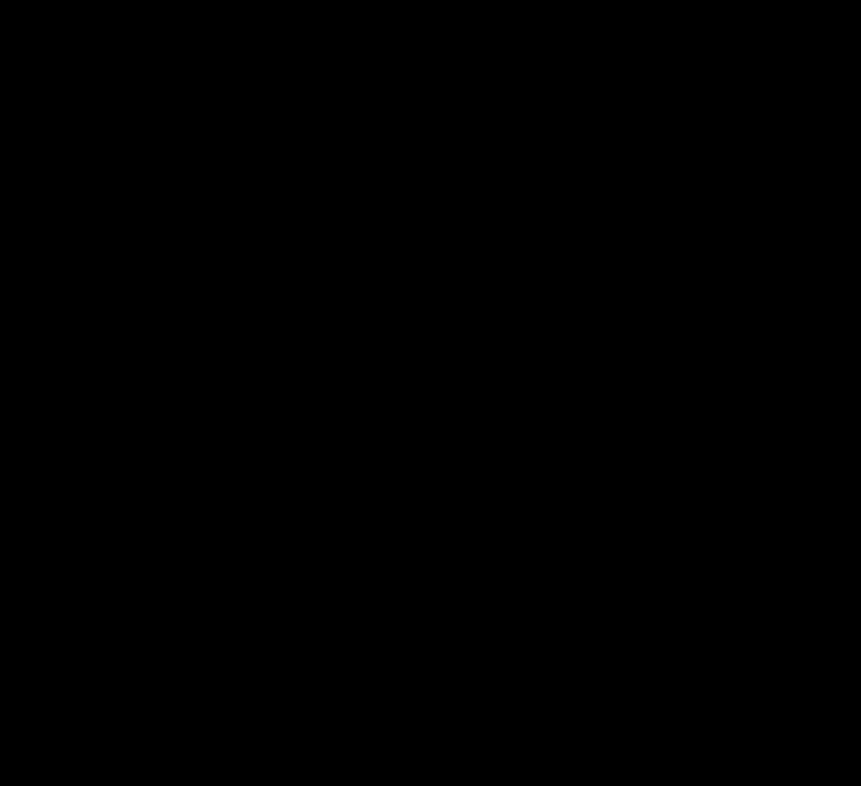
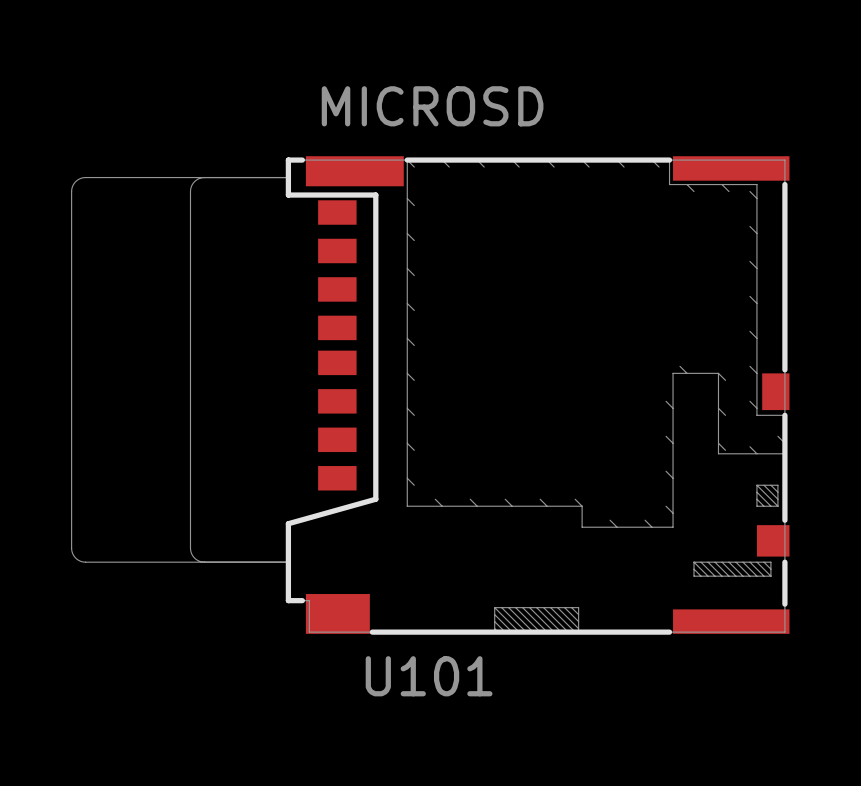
U101: none -> MICROSD (430, 395)

